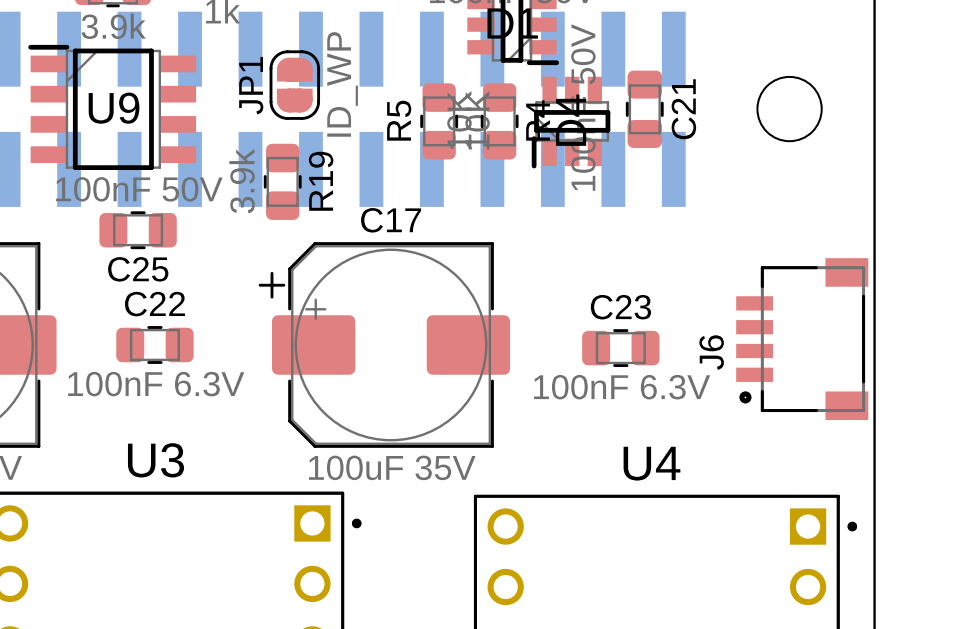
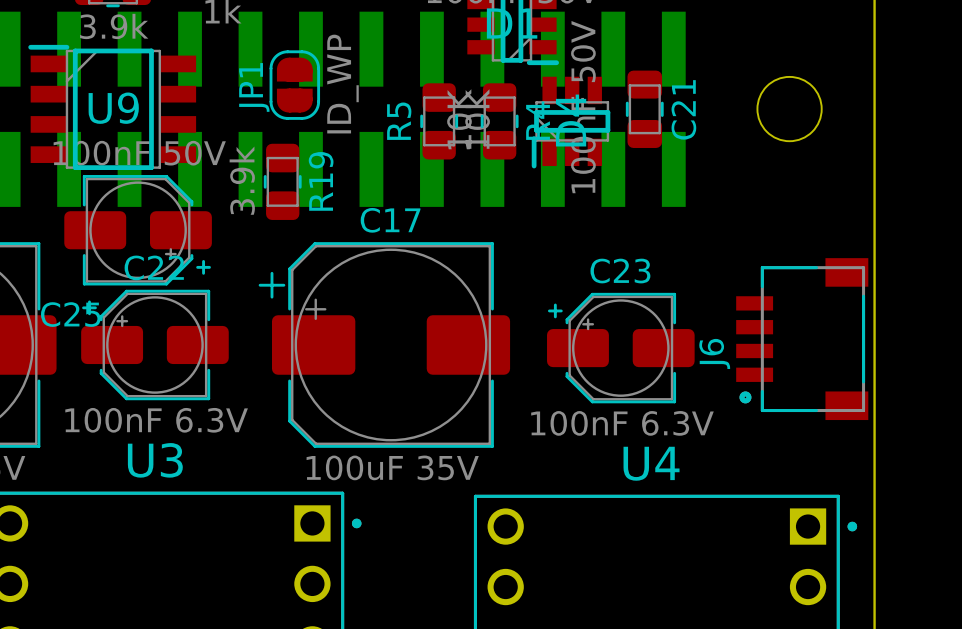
C25 footprint: [99, 211, 177, 250] -> [64, 175, 212, 286]
C25 name position: C25 (138, 269) -> C25 (70, 314)
C22 footprint: [116, 326, 194, 364] -> [81, 289, 229, 401]
C23 footprint: [582, 329, 660, 368] -> [547, 292, 695, 404]

